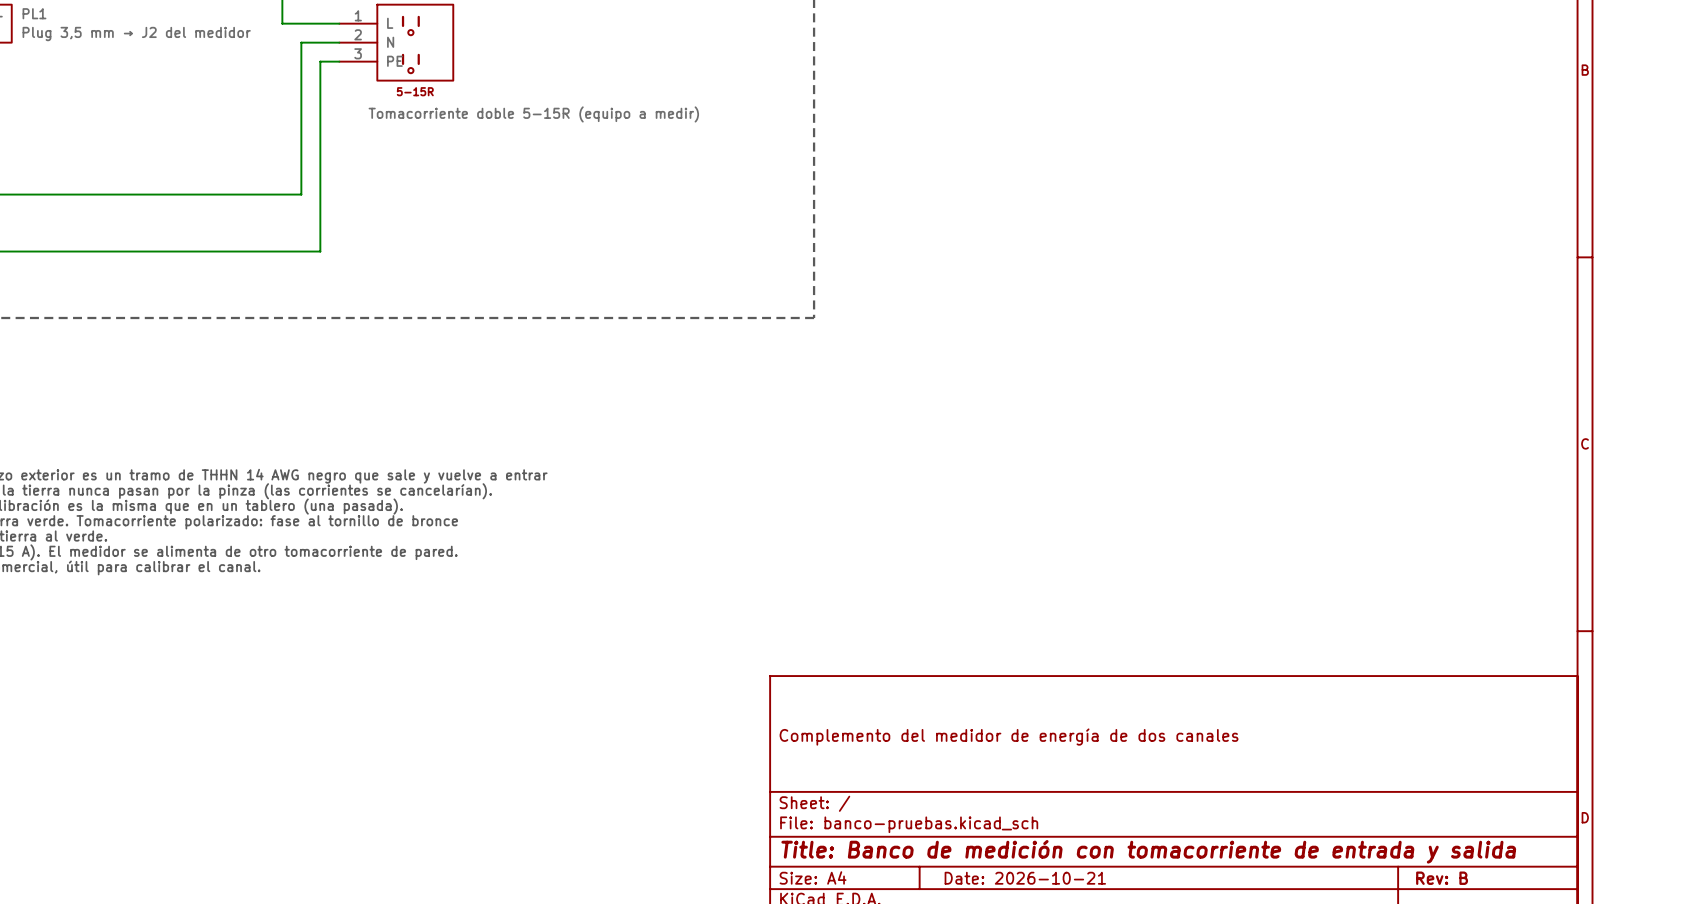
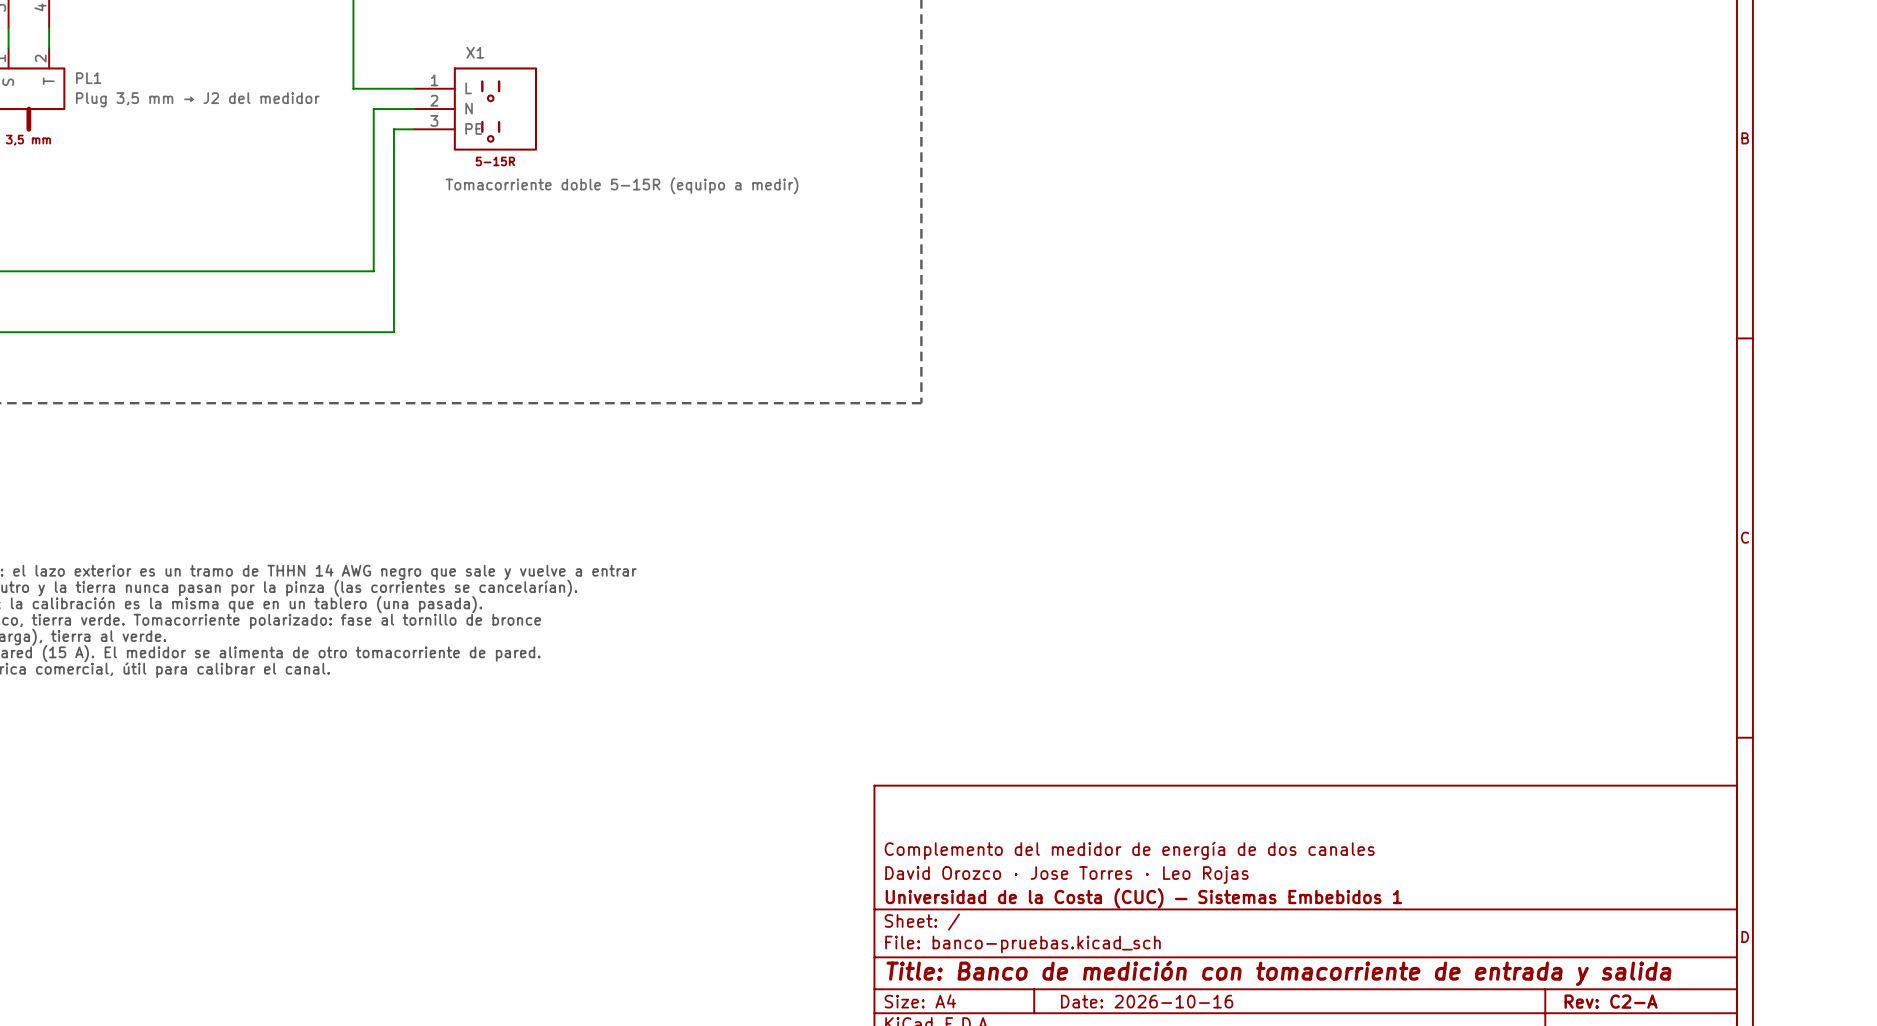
title block: none -> David Orozco · Jose Torres · Leo Rojas (1066, 875)
title block: none -> Universidad de la Costa (CUC) — Sistemas Embebidos 1 (1143, 898)
title block: Date: 2026-10-21 (1025, 878) -> Date: 2026-10-16 (1147, 1001)
title block: Rev: B (1442, 878) -> Rev: C2-A (1611, 1001)

